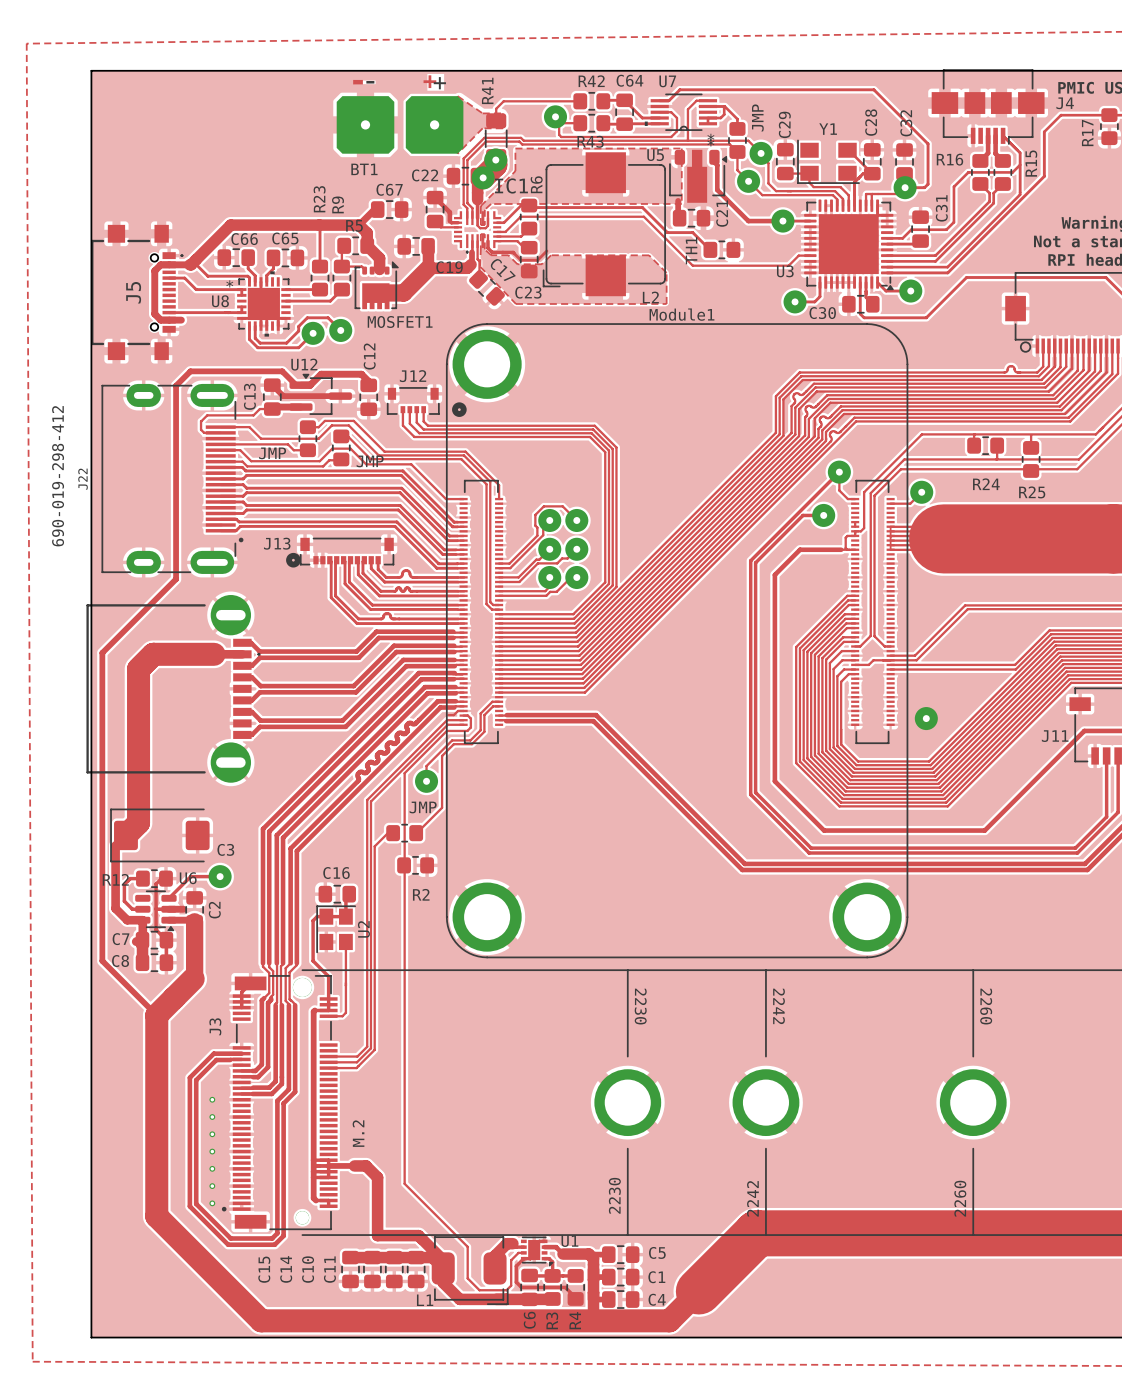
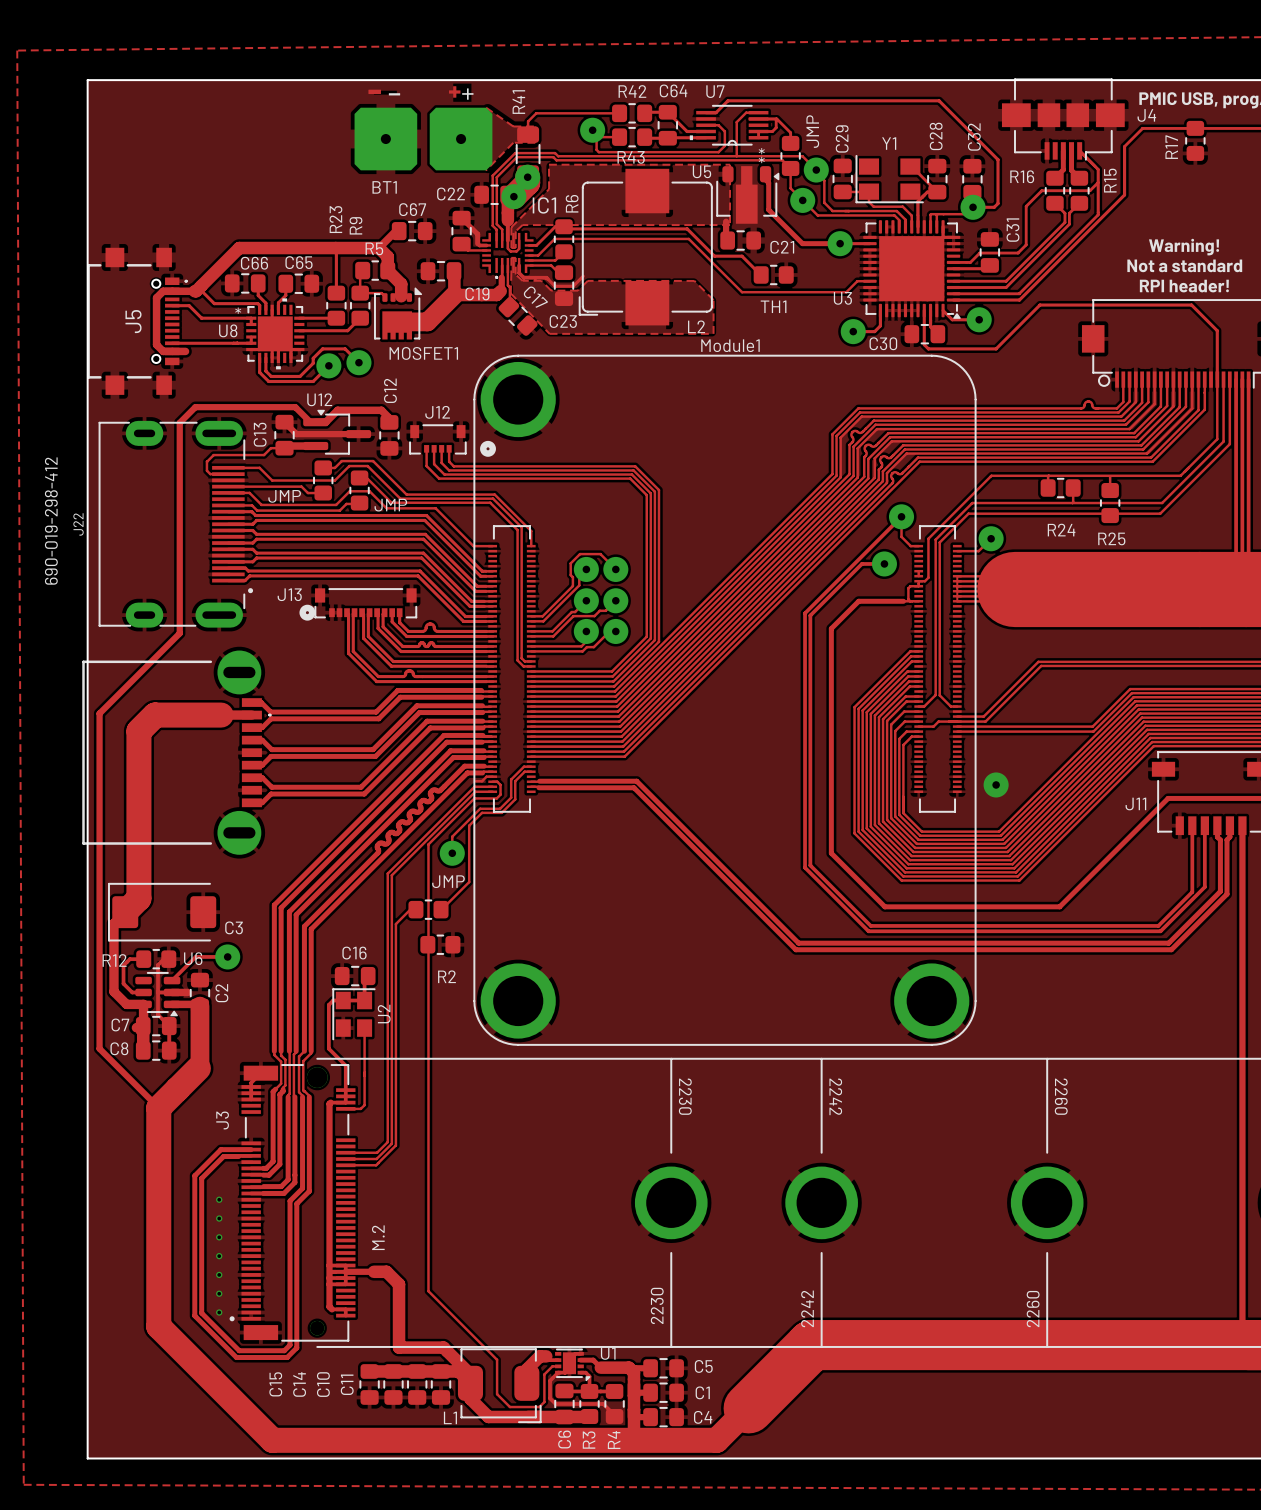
C21 name rotation: 0° (722, 213) -> 90° clockwise (782, 247)
TH1 name rotation: 0° (691, 250) -> 90° clockwise (773, 306)
TH1 name position: TH1 (691, 250) -> TH1 (773, 306)

